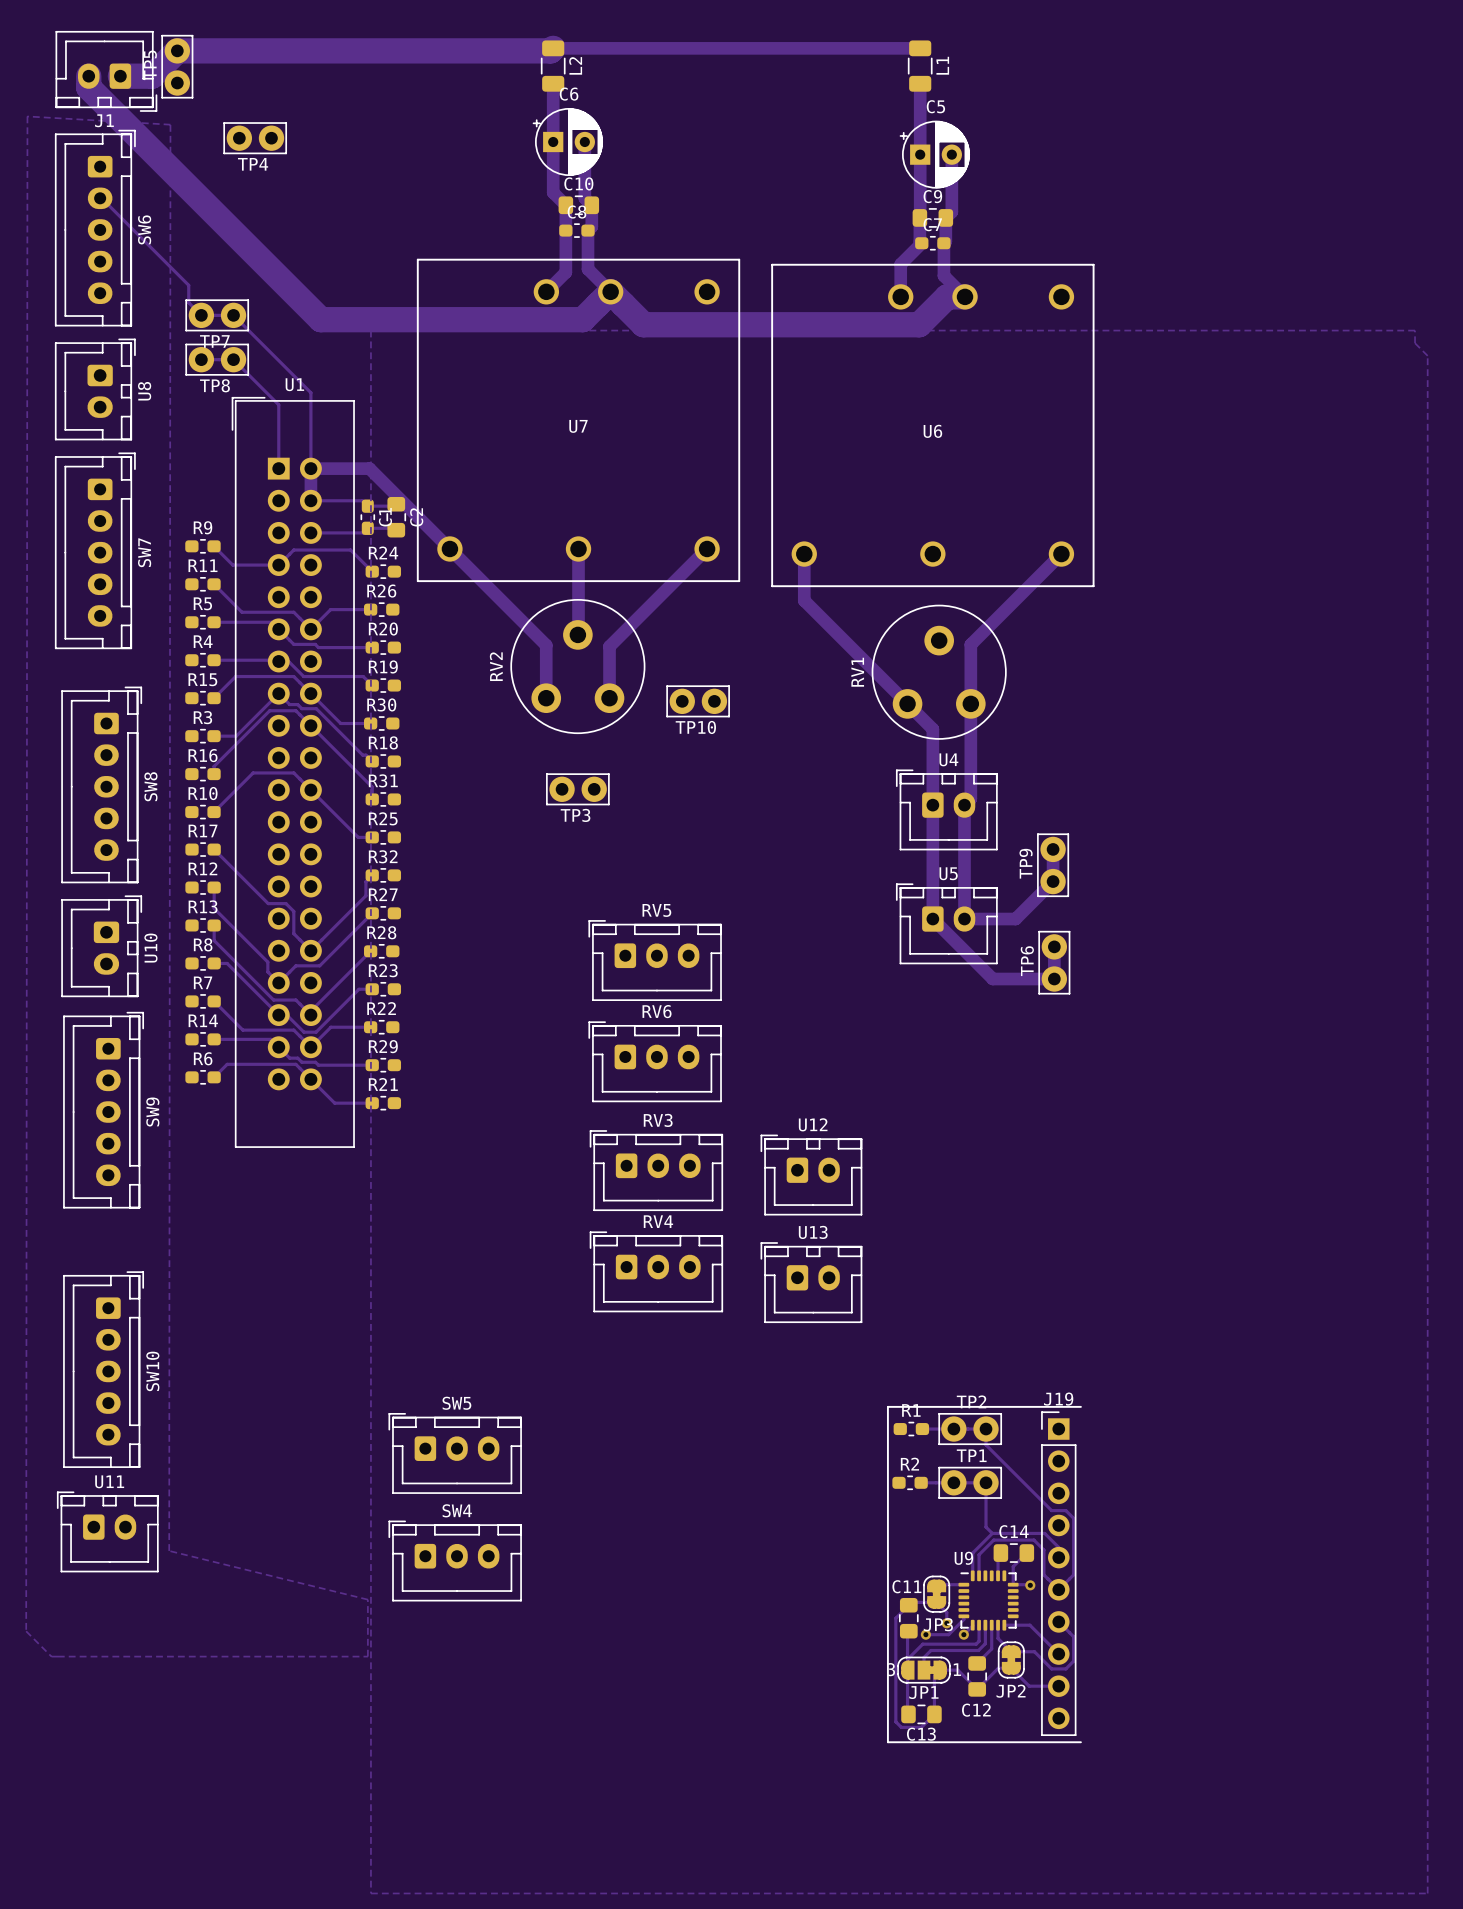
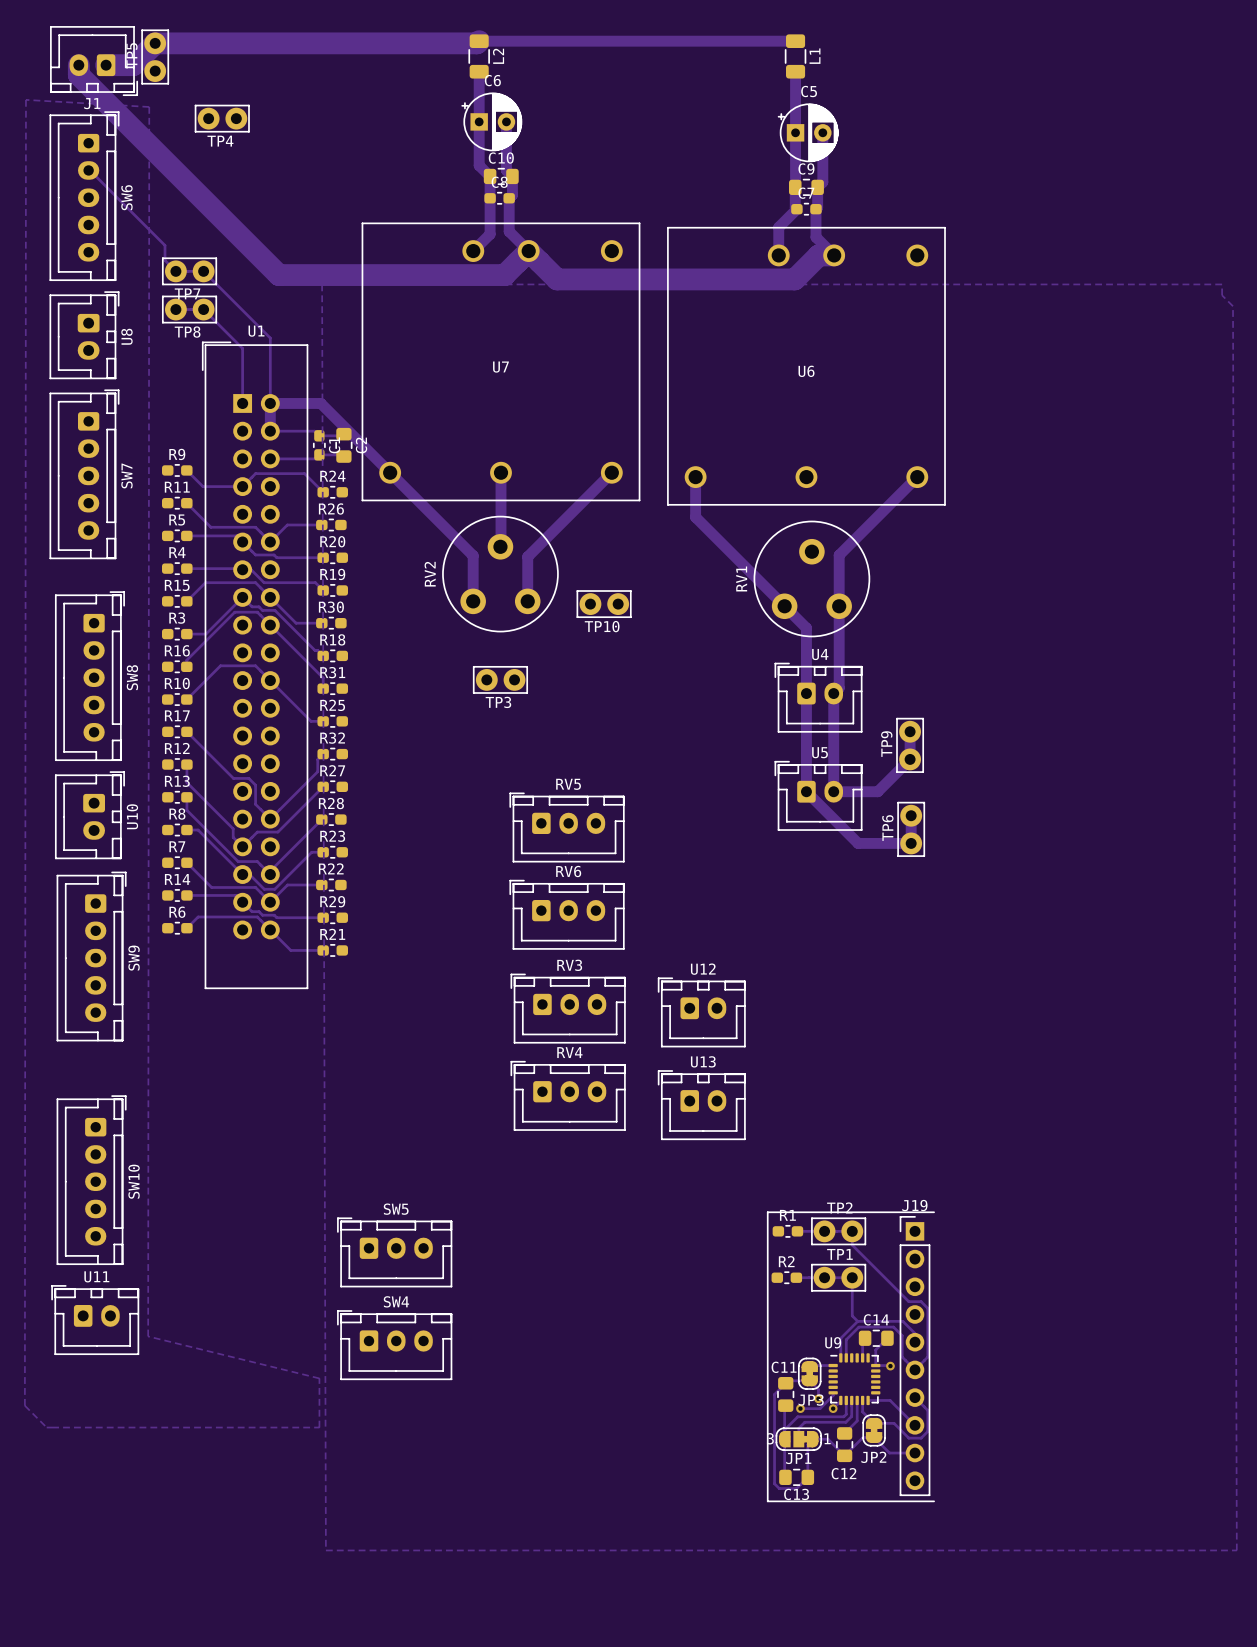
zone outline: (370, 330) (370, 1893) (1427, 1893) (1427, 355) -> (322, 284) (325, 1550) (1236, 1550) (1233, 306)

